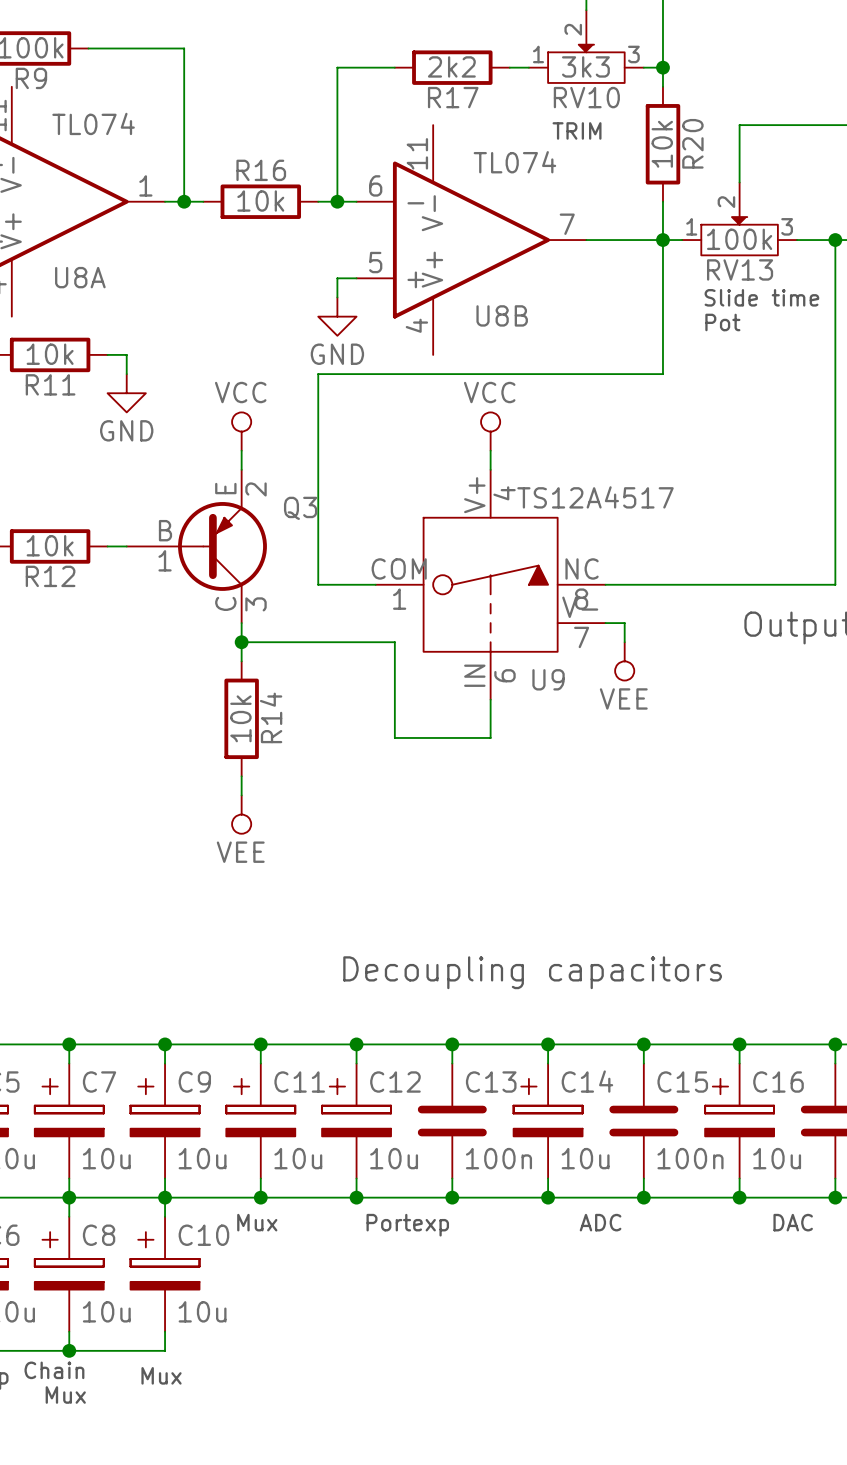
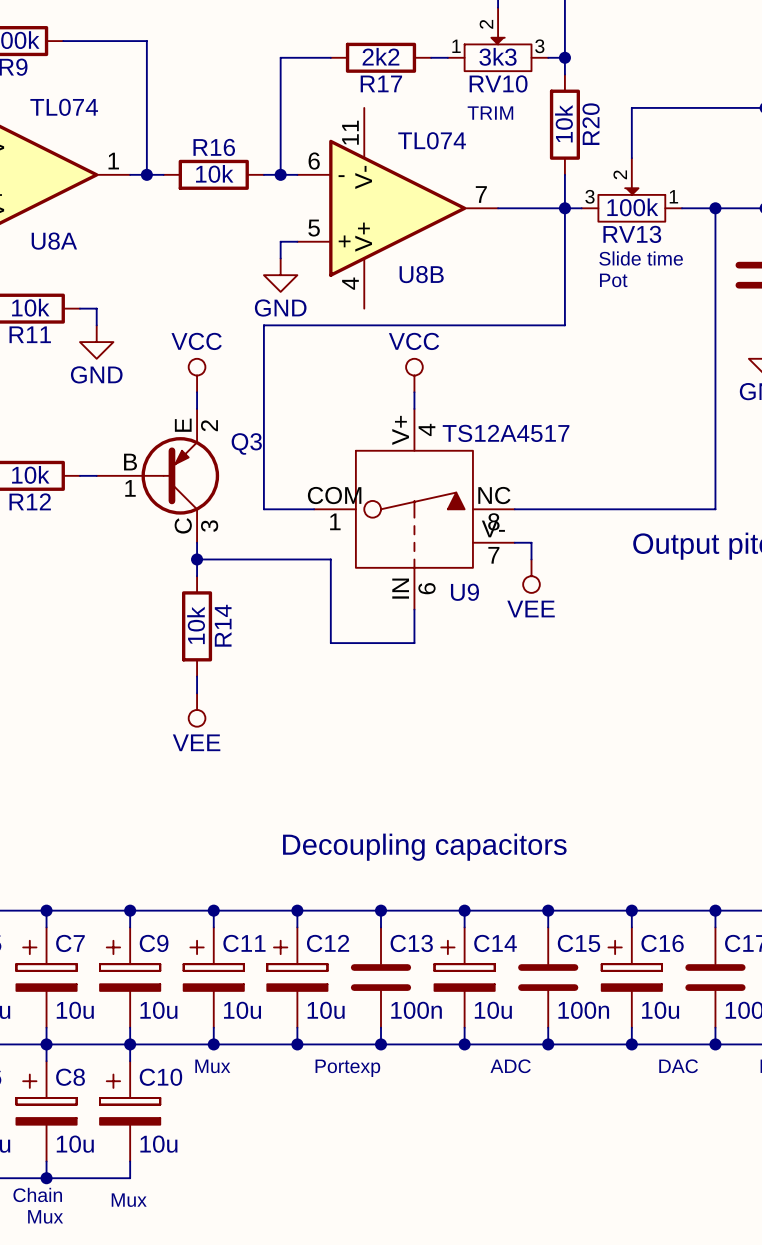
RV13 flip: as is (739, 236) -> left-right (631, 204)

